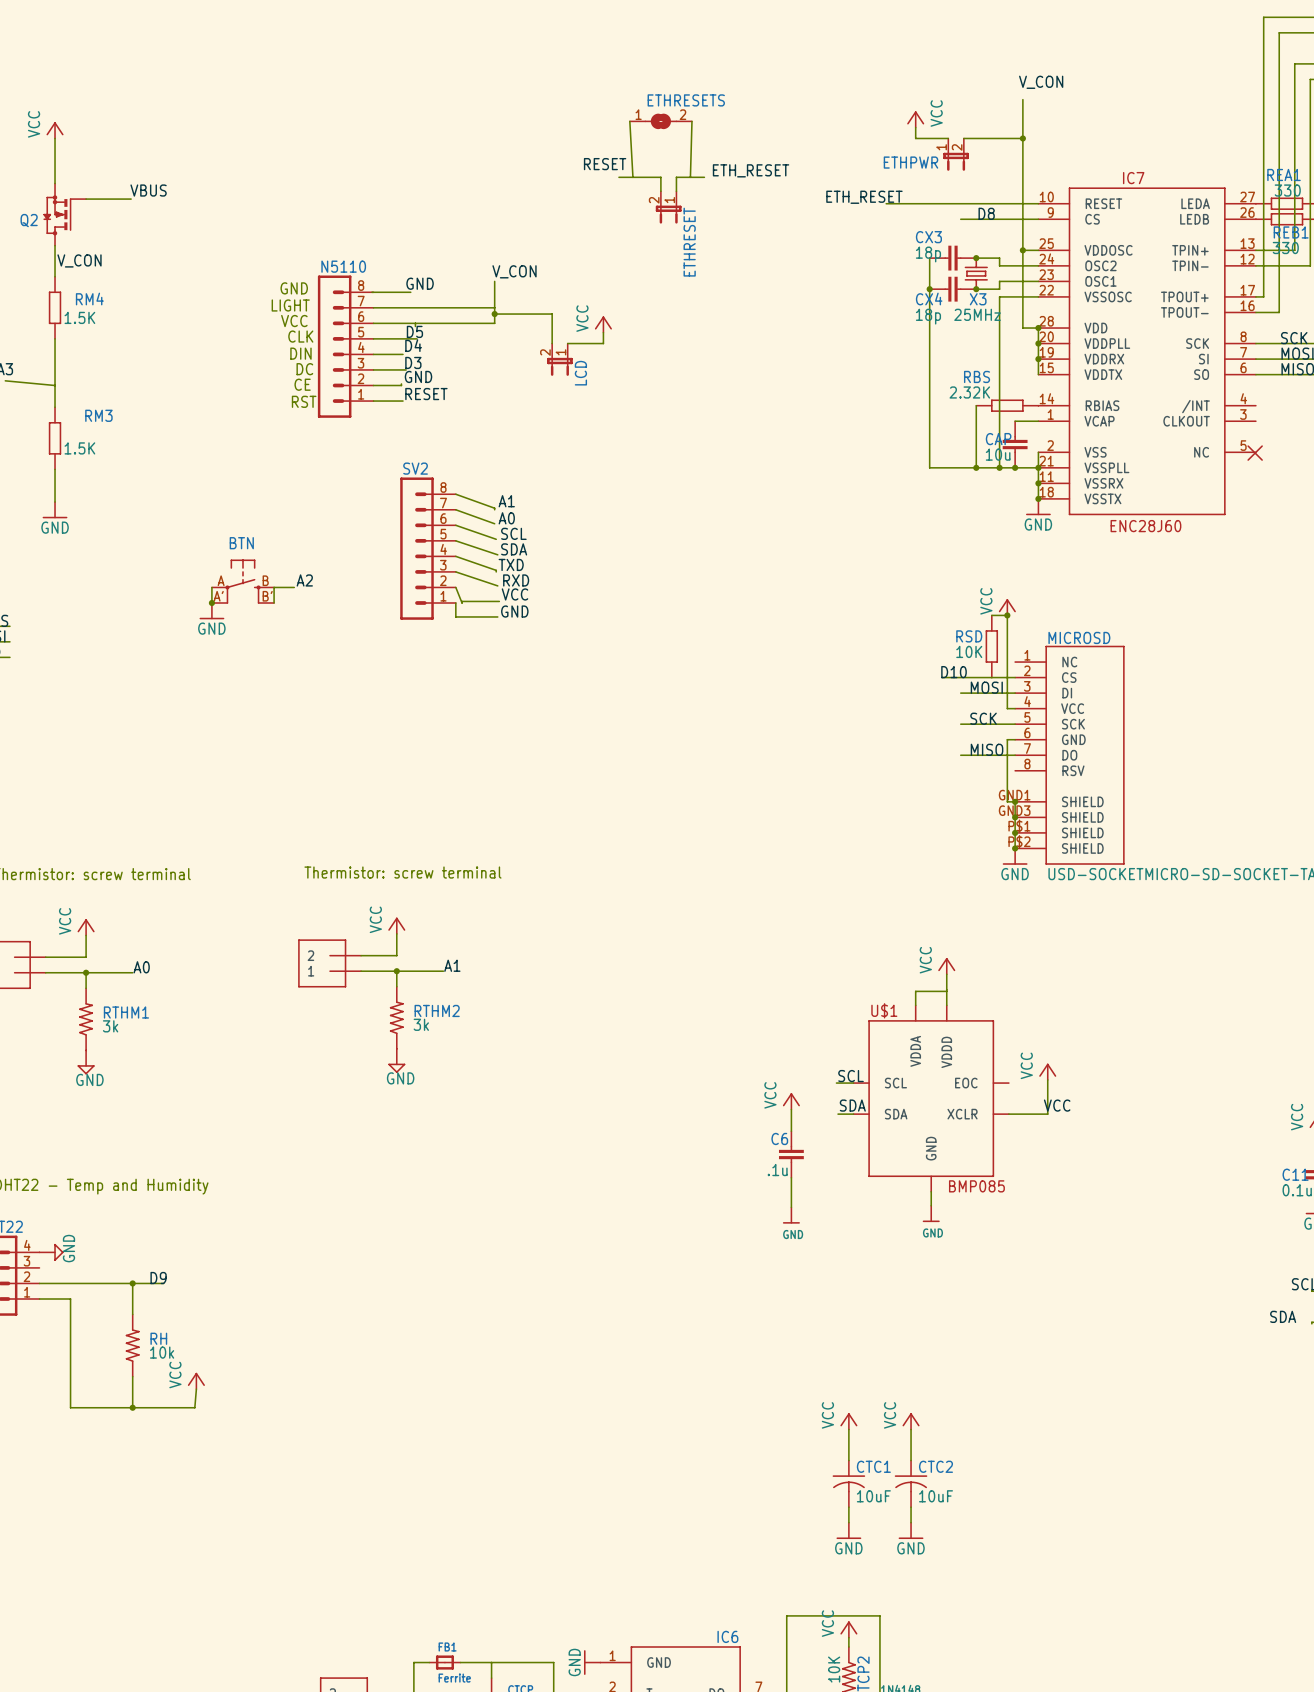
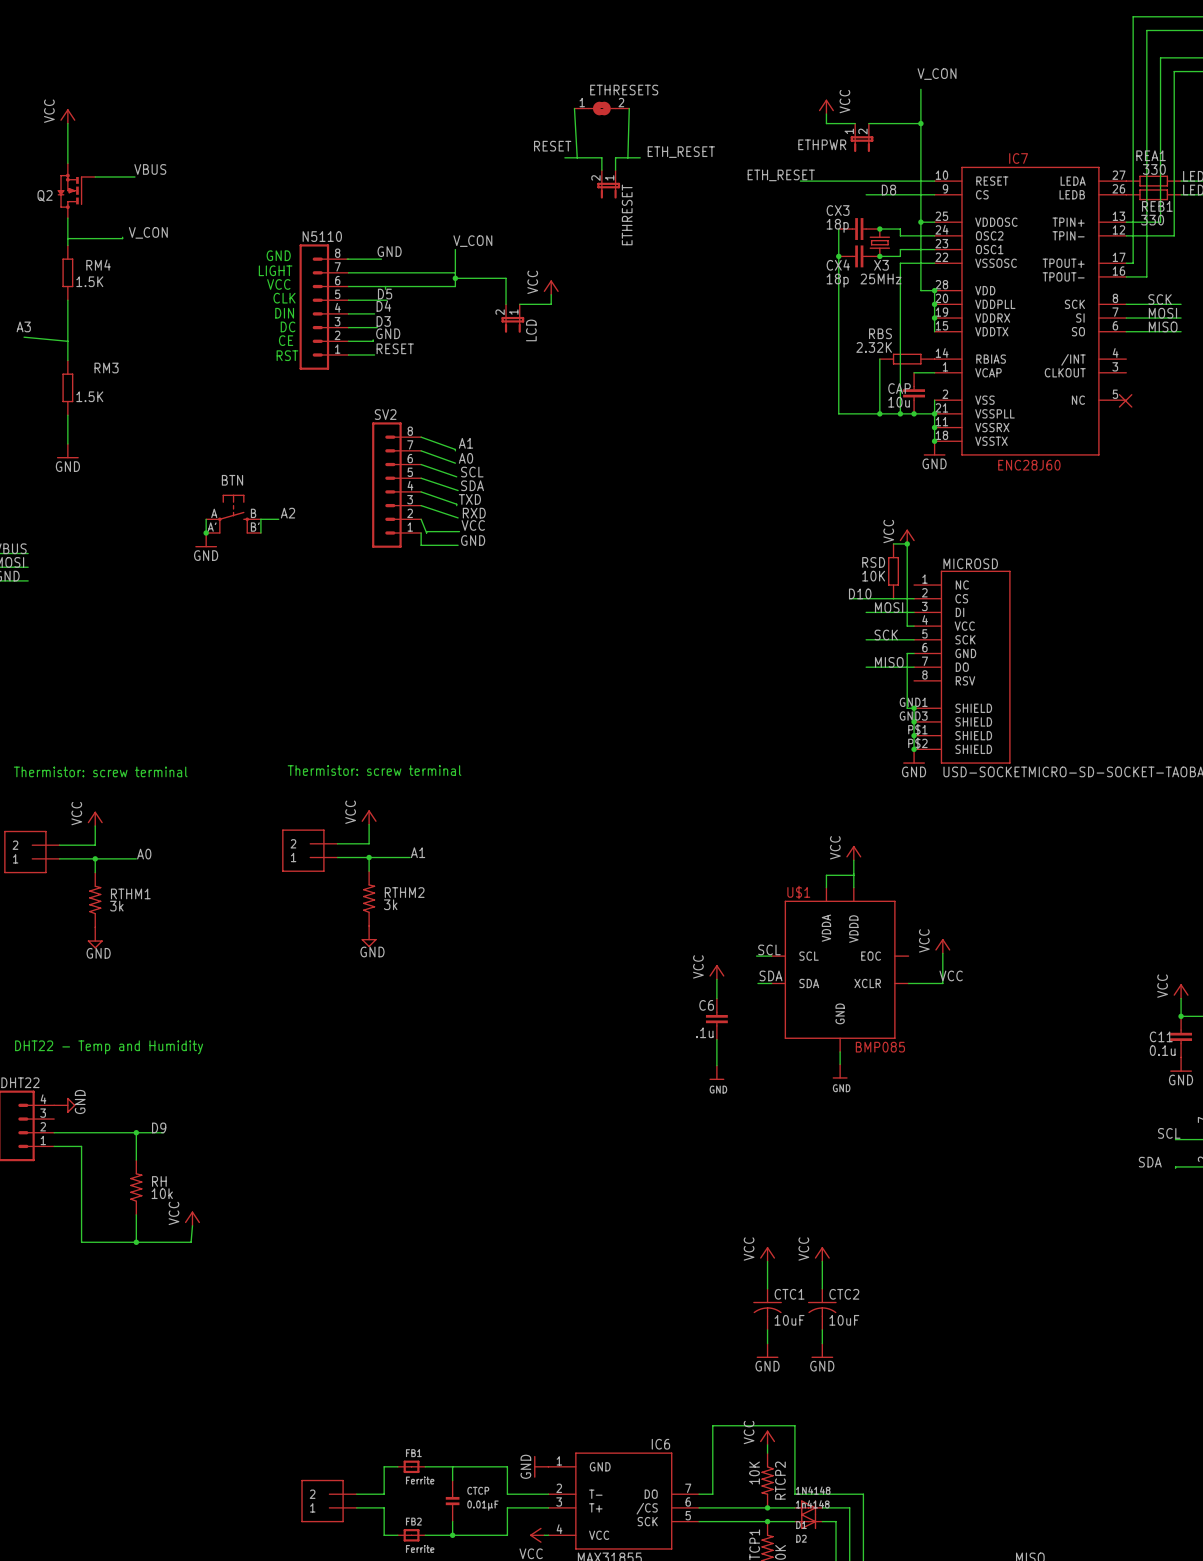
label position: V_CON (79, 260) -> V_CON (148, 232)
wire: none -> (122, 237) (67, 238)

